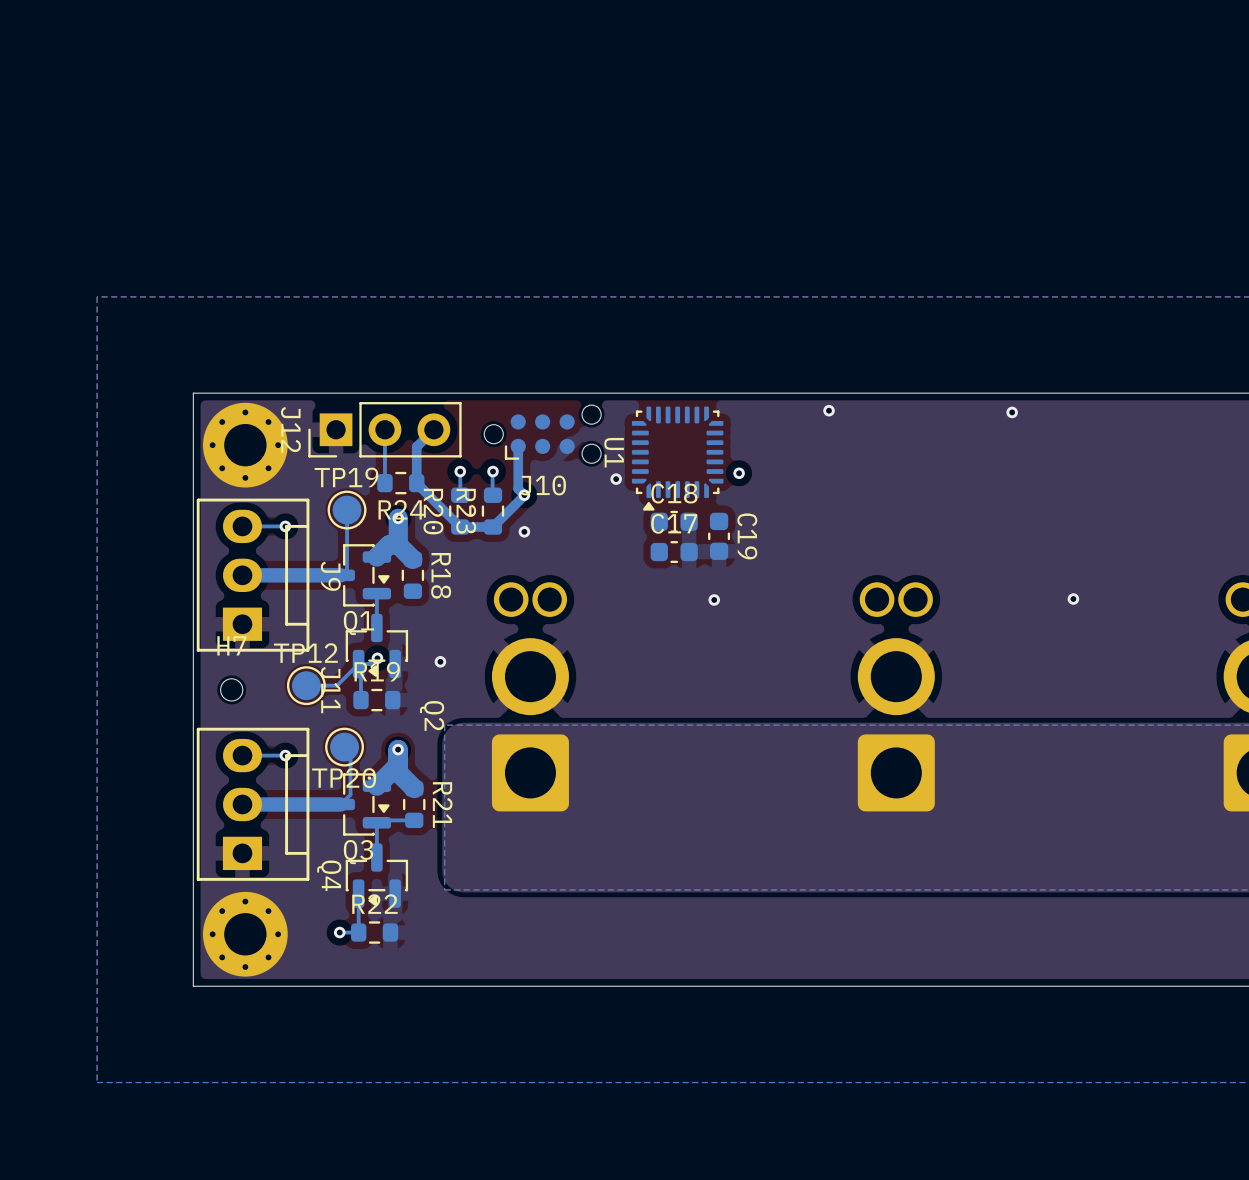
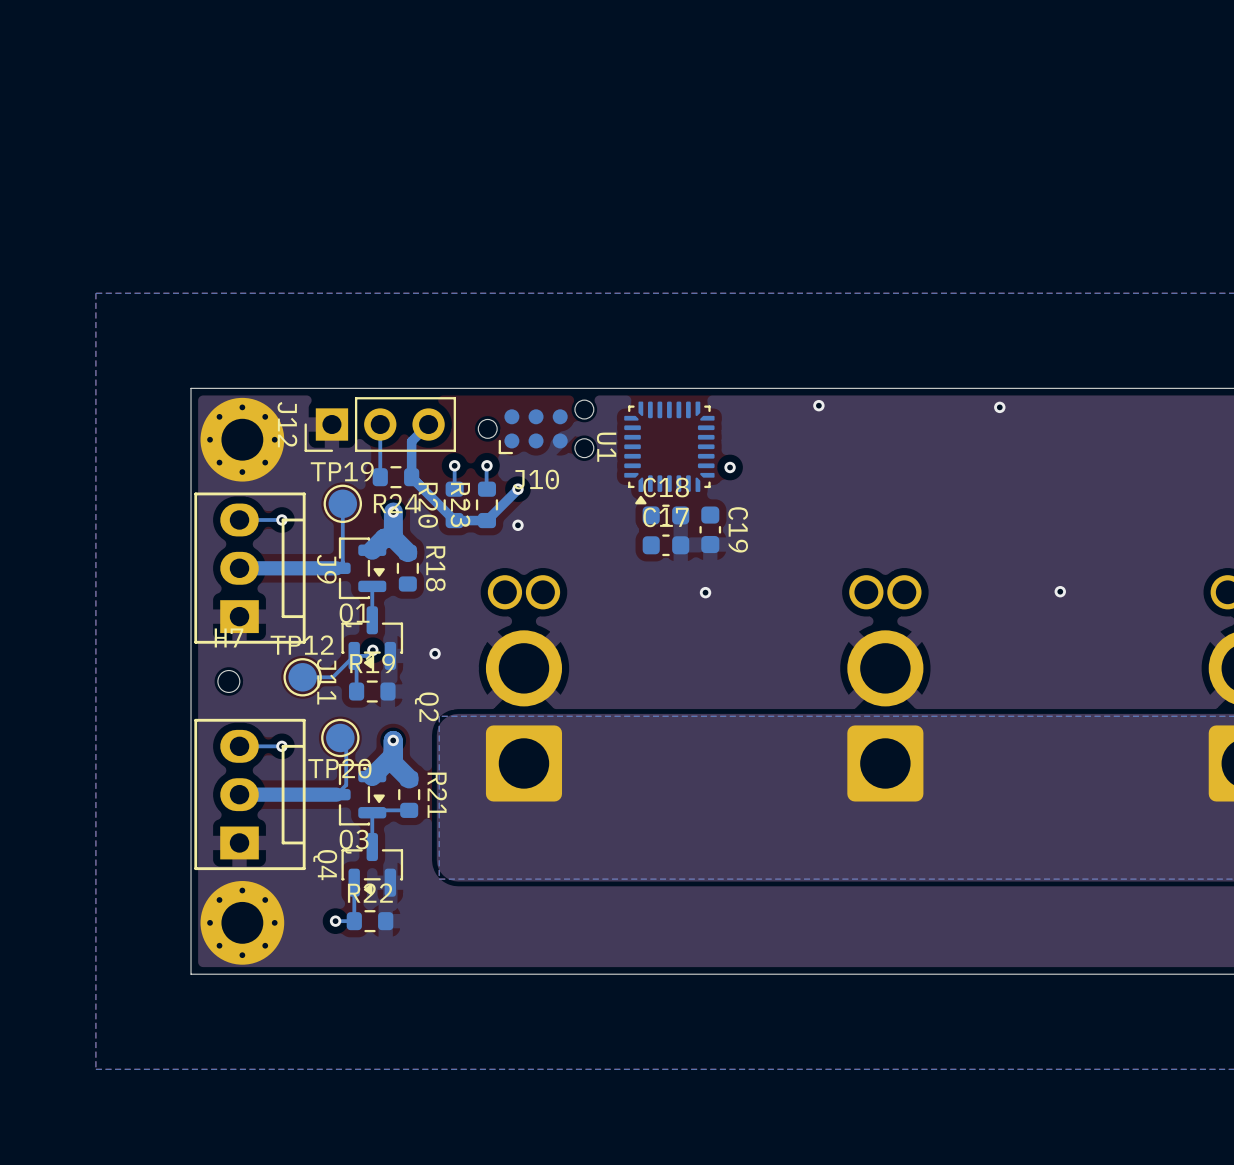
bottom track: (518, 446) (518, 489) (524, 495) -> none
via: (616, 479) -> none

